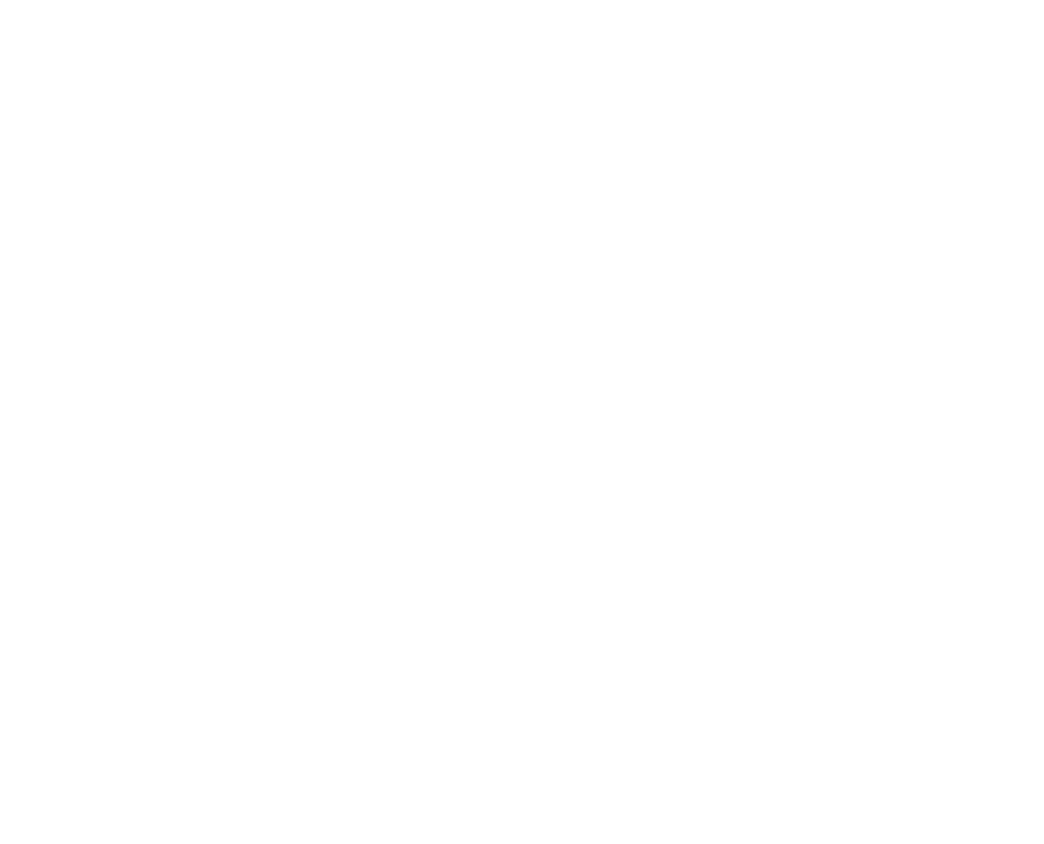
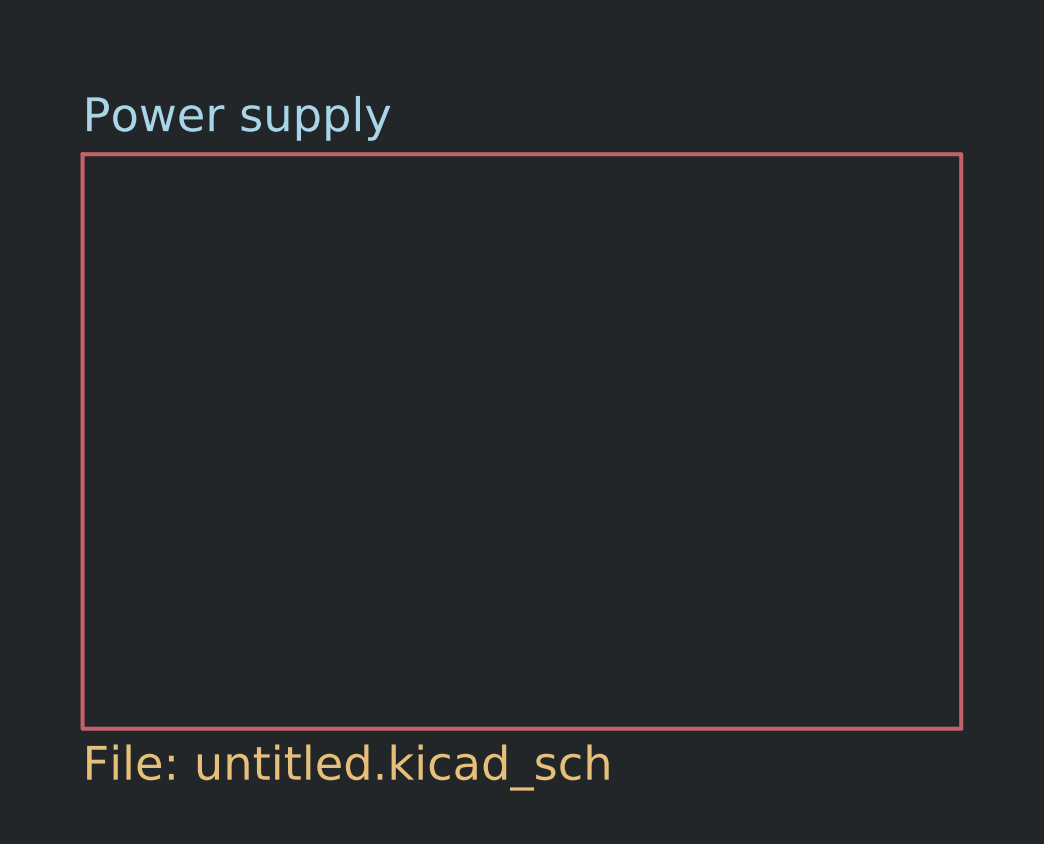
sheet Power supply: none -> File: untitled.kicad_sch (521, 441)

